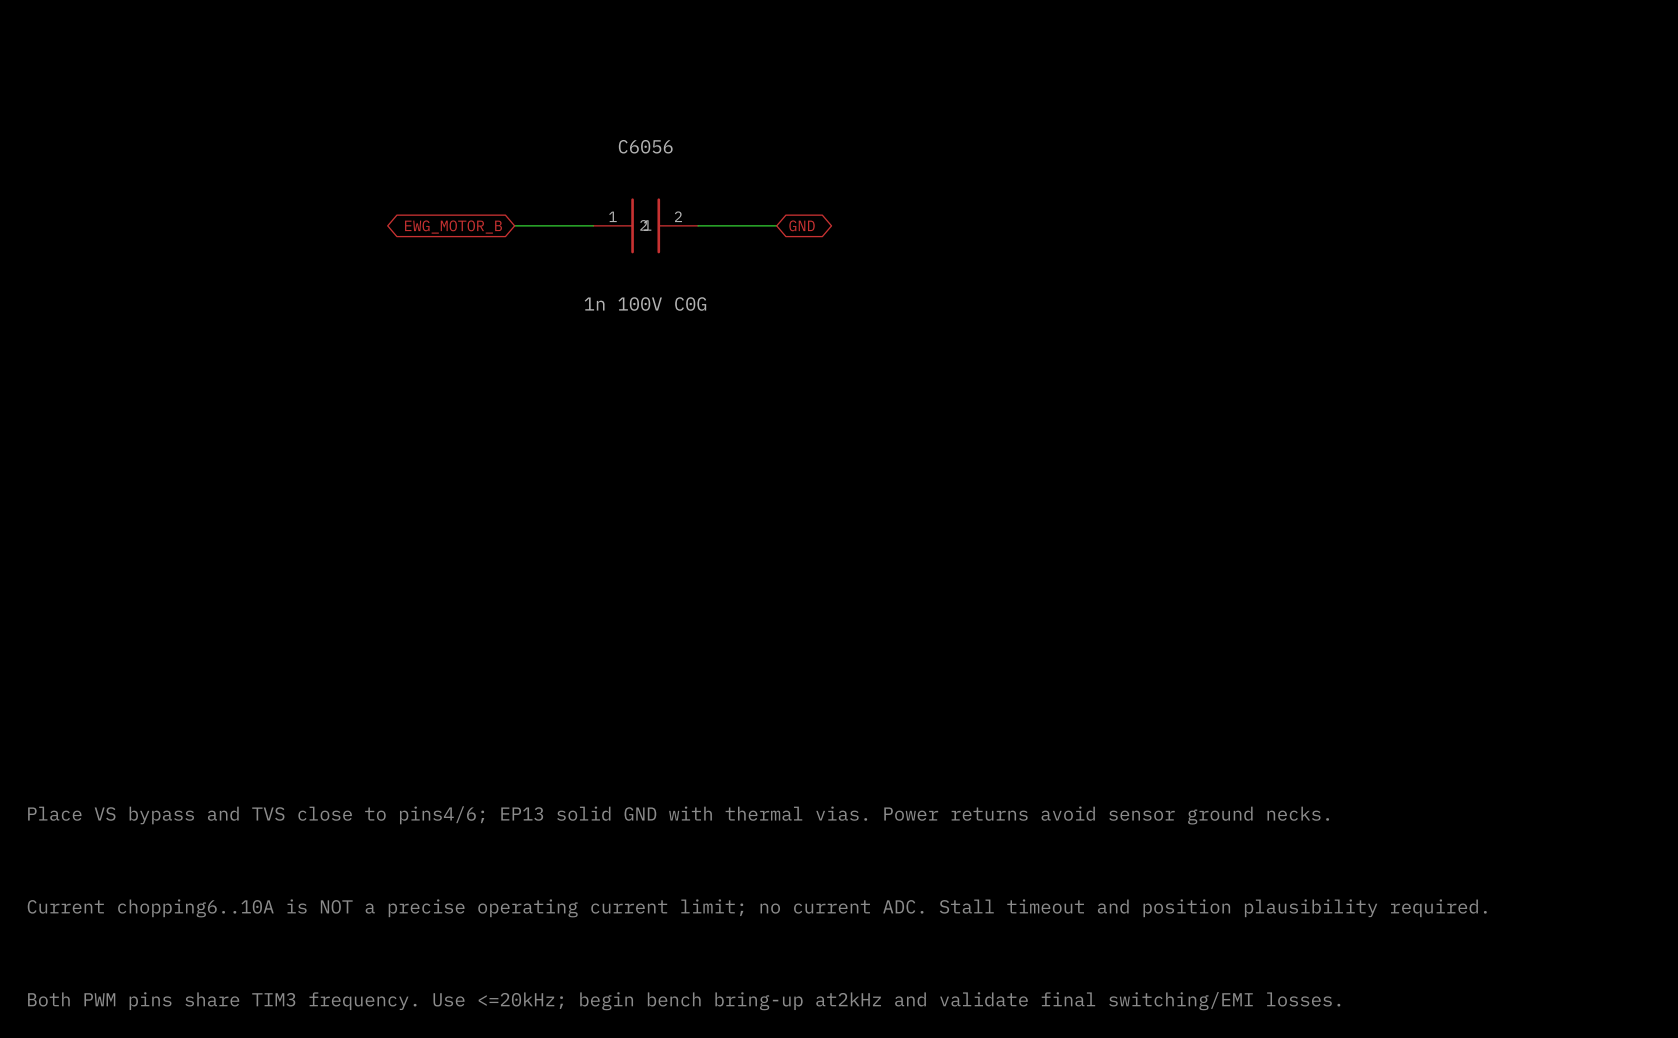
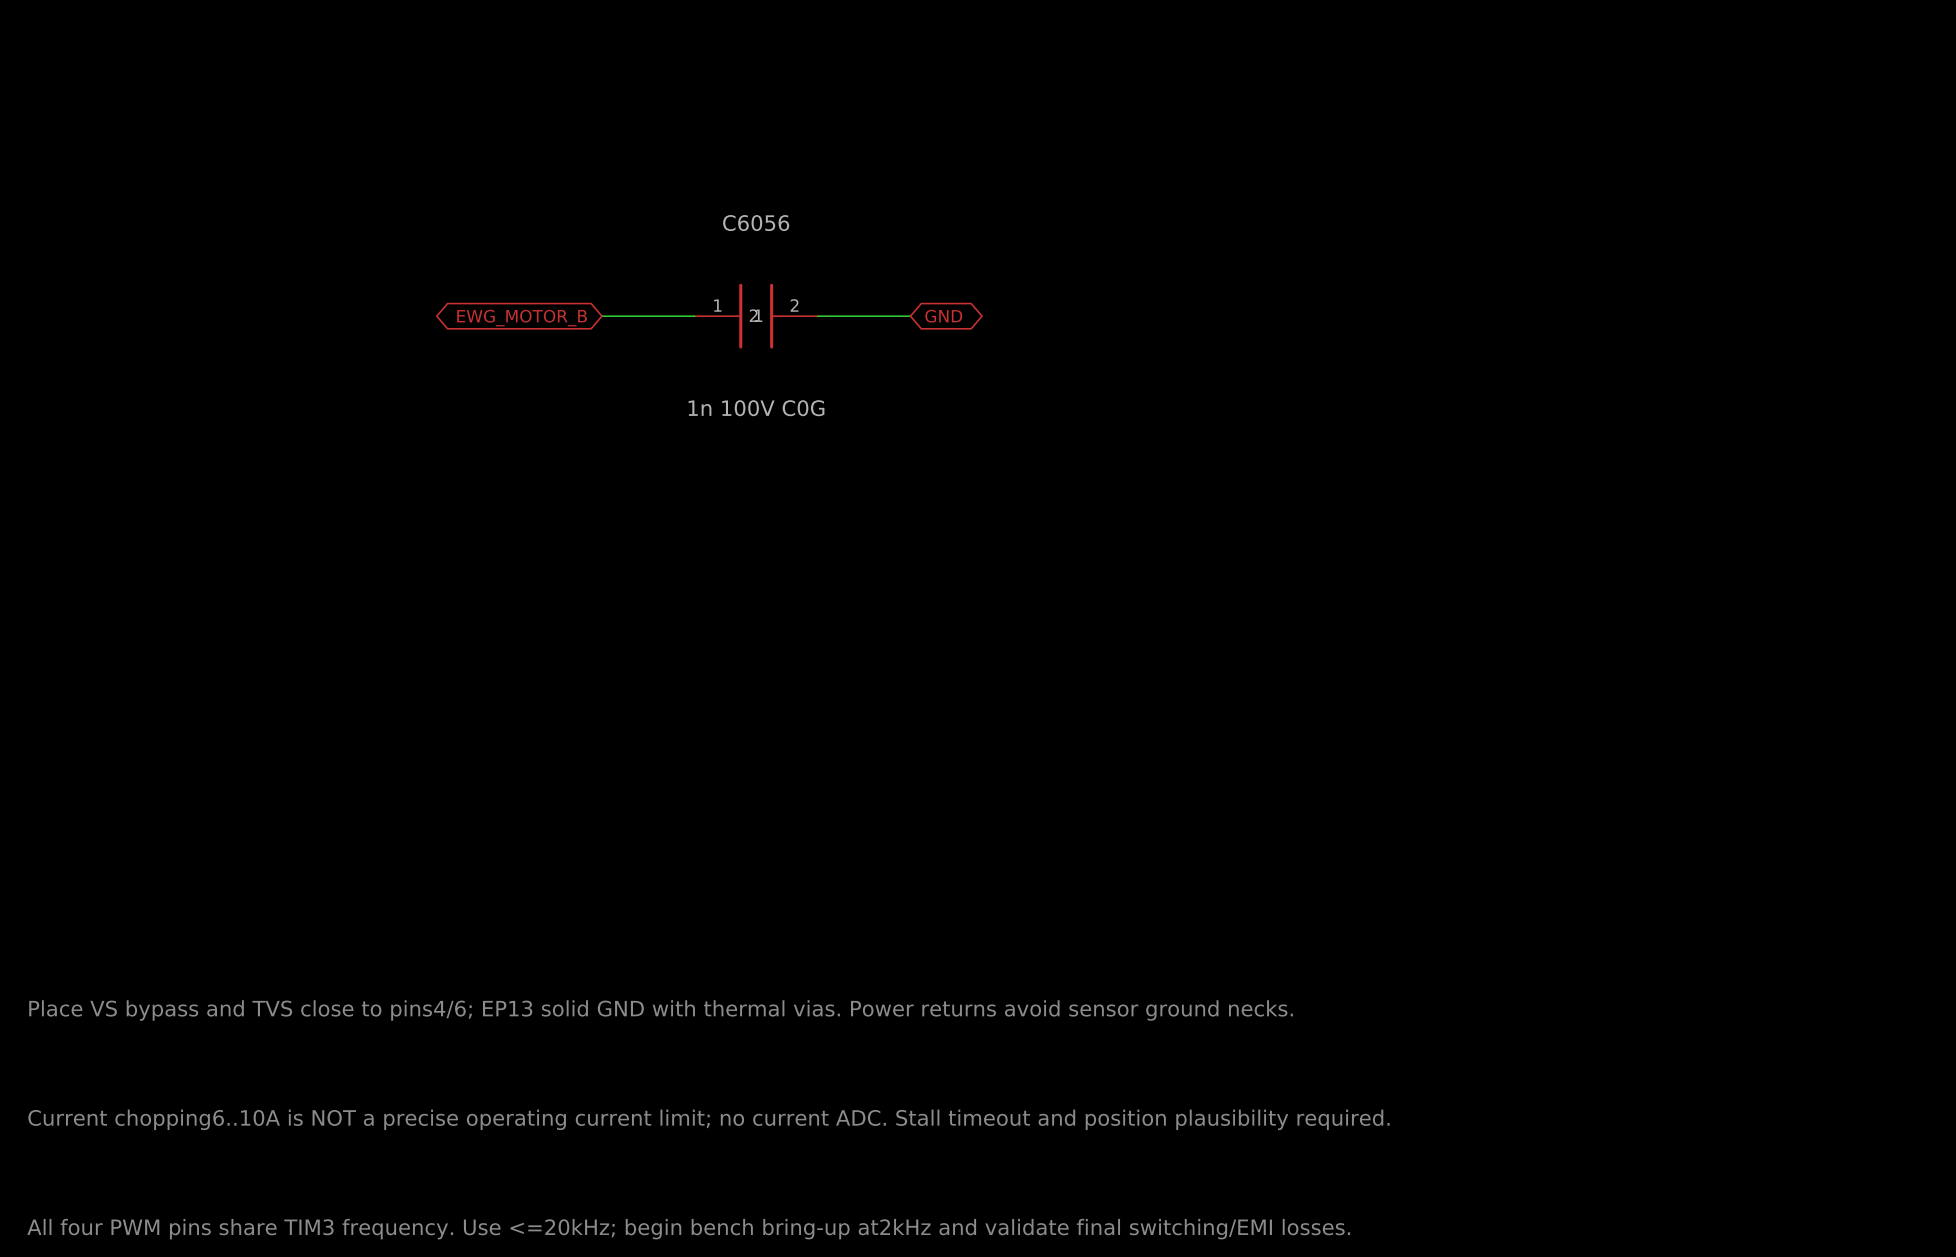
text: Both PWM pins share TIM3 frequency. Use <=20kHz; begin bench bring-up at2kHz and validate final switching/EMI losses. (684, 1001) -> All four PWM pins share TIM3 frequency. Use <=20kHz; begin bench bring-up at2kHz and validate final switching/EMI losses. (688, 1229)

